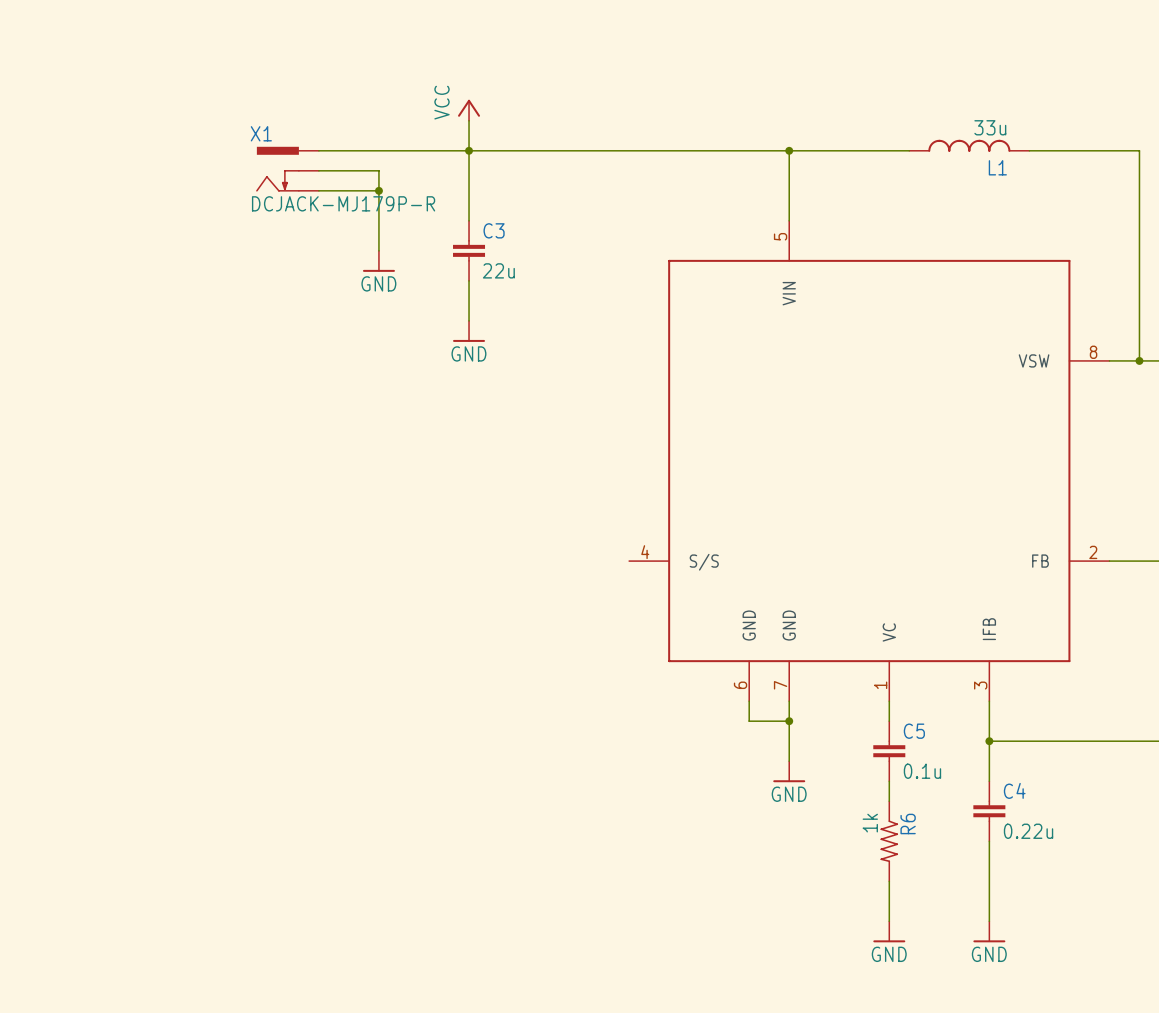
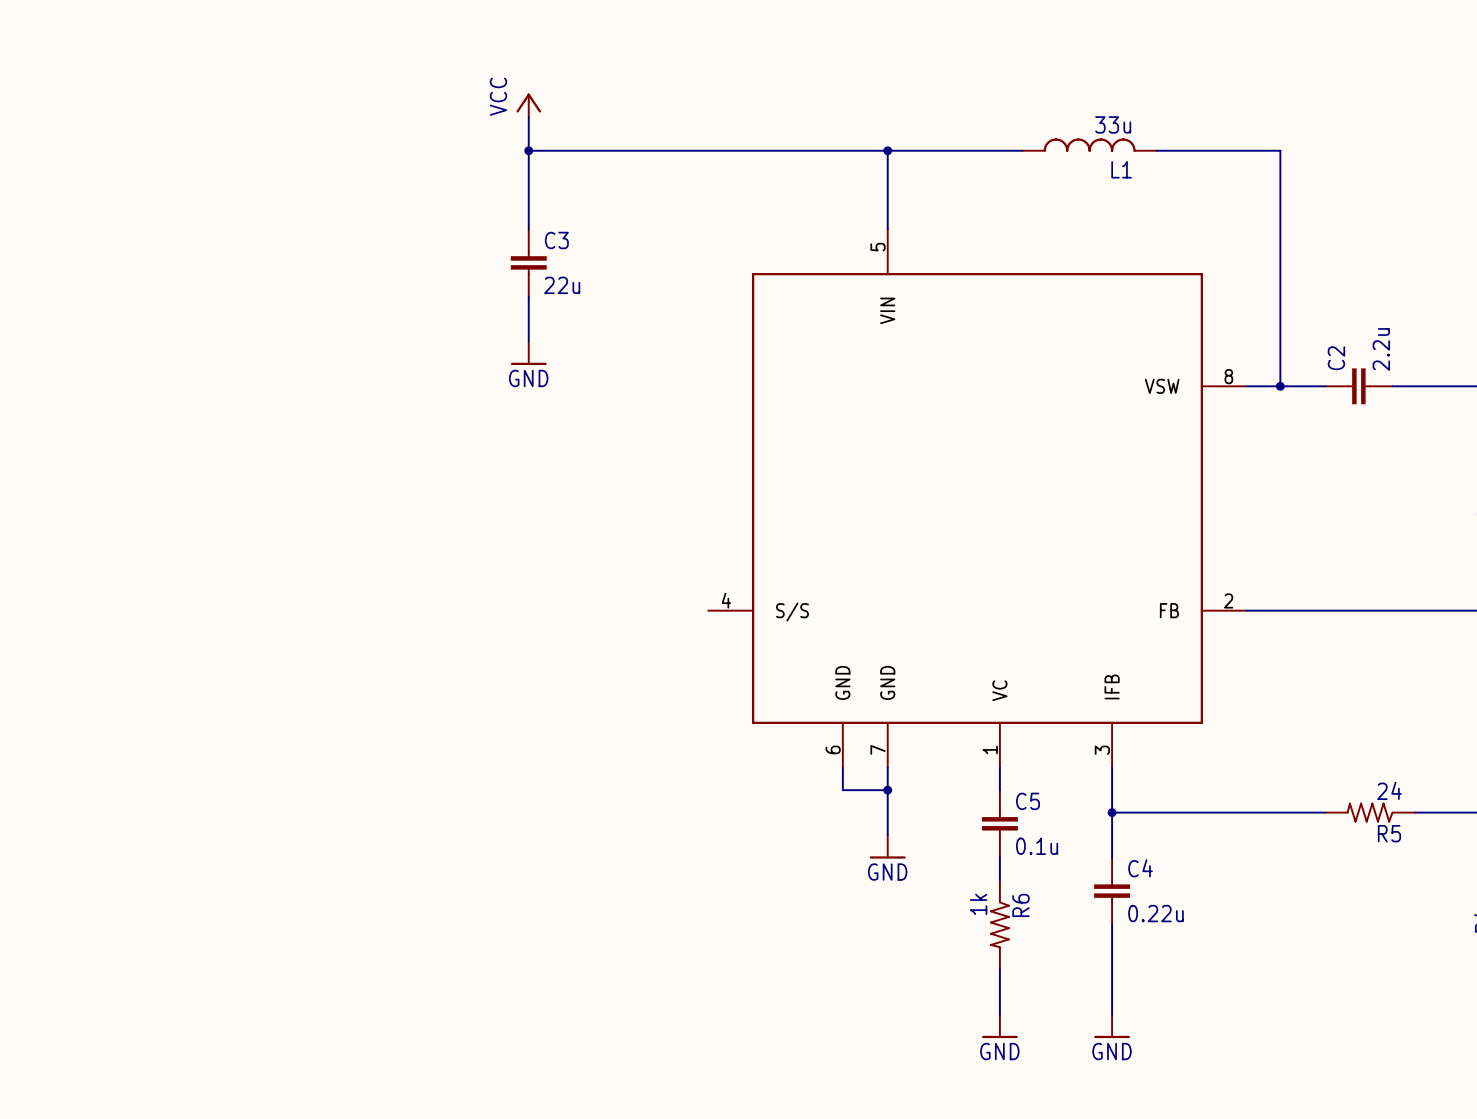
wire: (318, 150) (469, 150) -> none
X1: DCJACK-MJ179P-R (287, 169) -> none
wire: (318, 170) (378, 170) (378, 250) -> none
wire: (318, 190) (378, 190) -> none
junction: (378, 190) -> none
power symbol: GND (378, 261) -> none

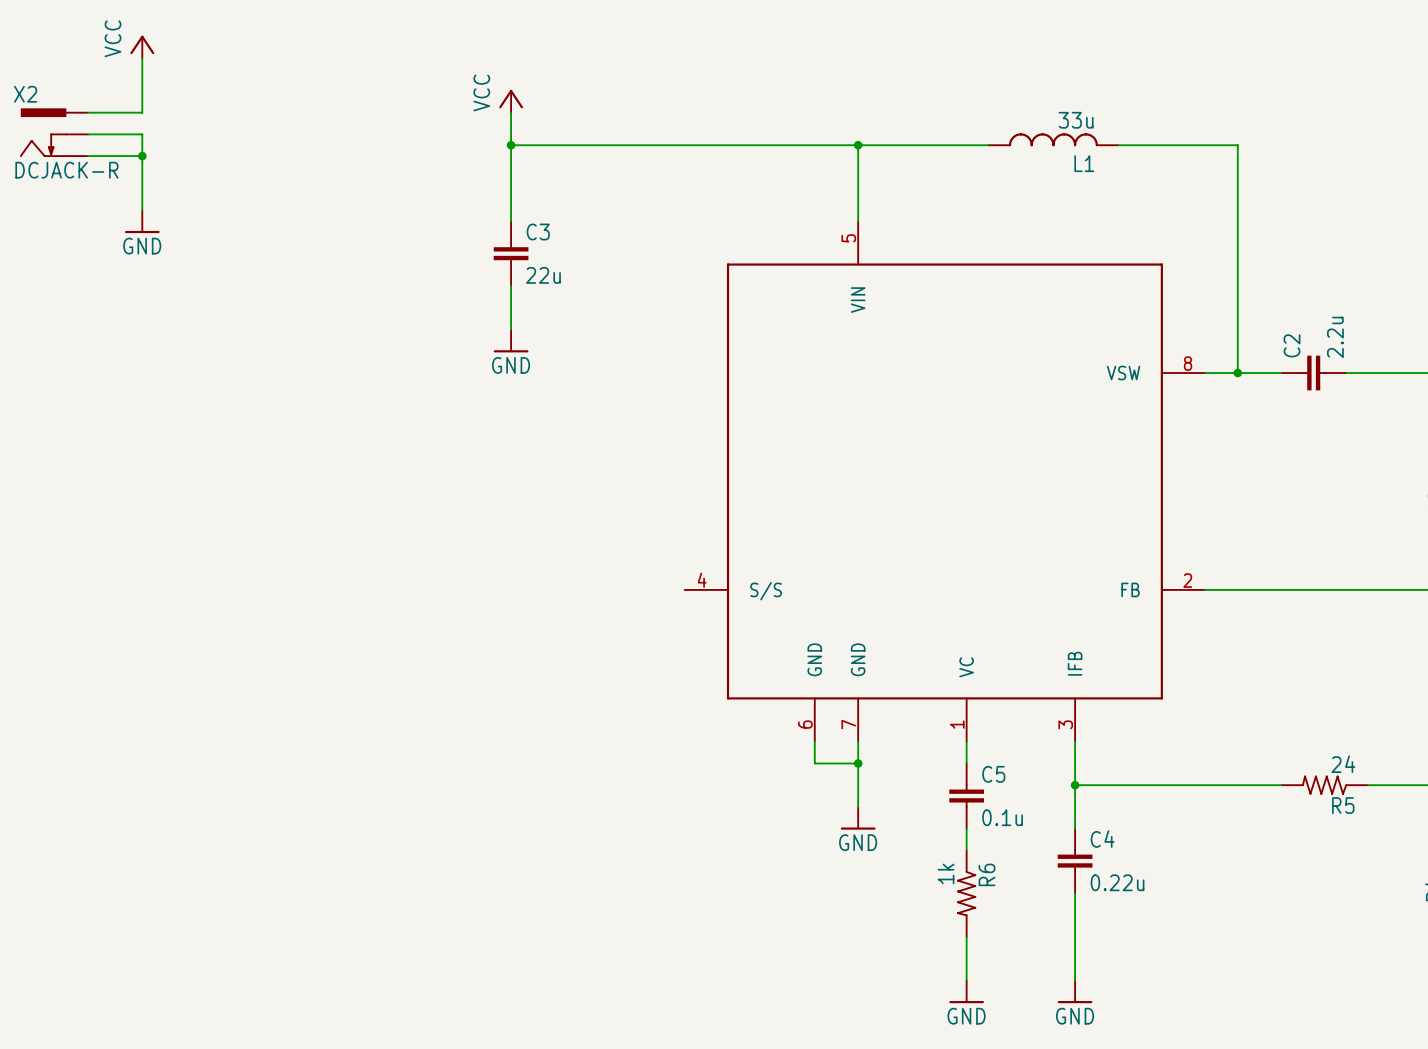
power symbol: none -> VCC (142, 47)
wire: none -> (142, 58) (142, 112) (88, 112)
X2: none -> DCJACK-R (54, 132)
wire: none -> (88, 134) (142, 134) (142, 210)
wire: none -> (88, 156) (142, 156)
junction: none -> (142, 156)
power symbol: none -> GND (142, 221)

